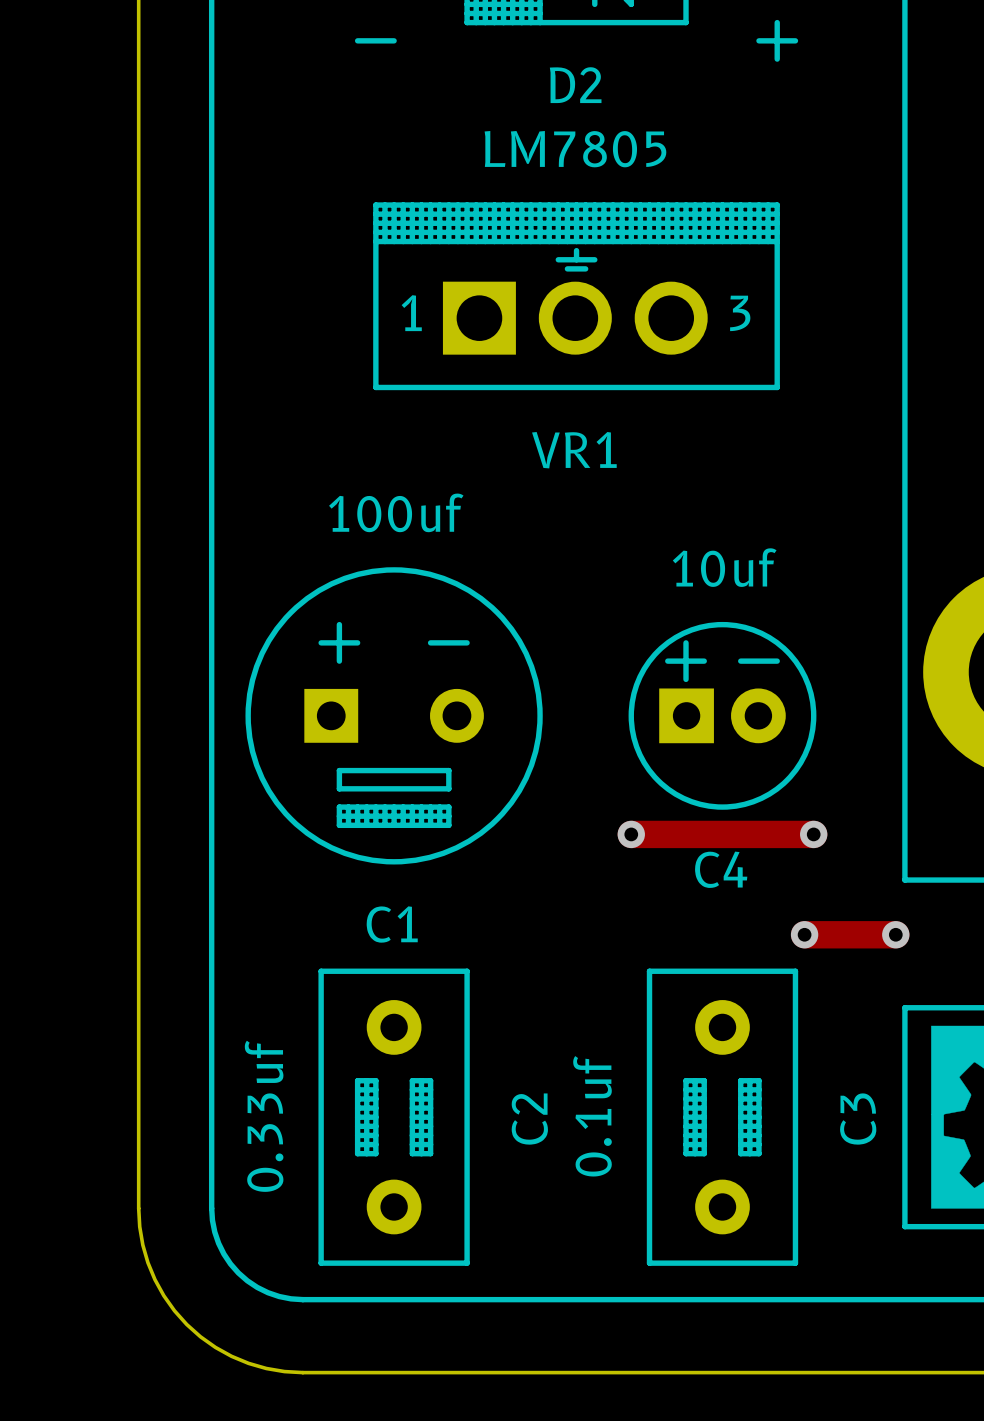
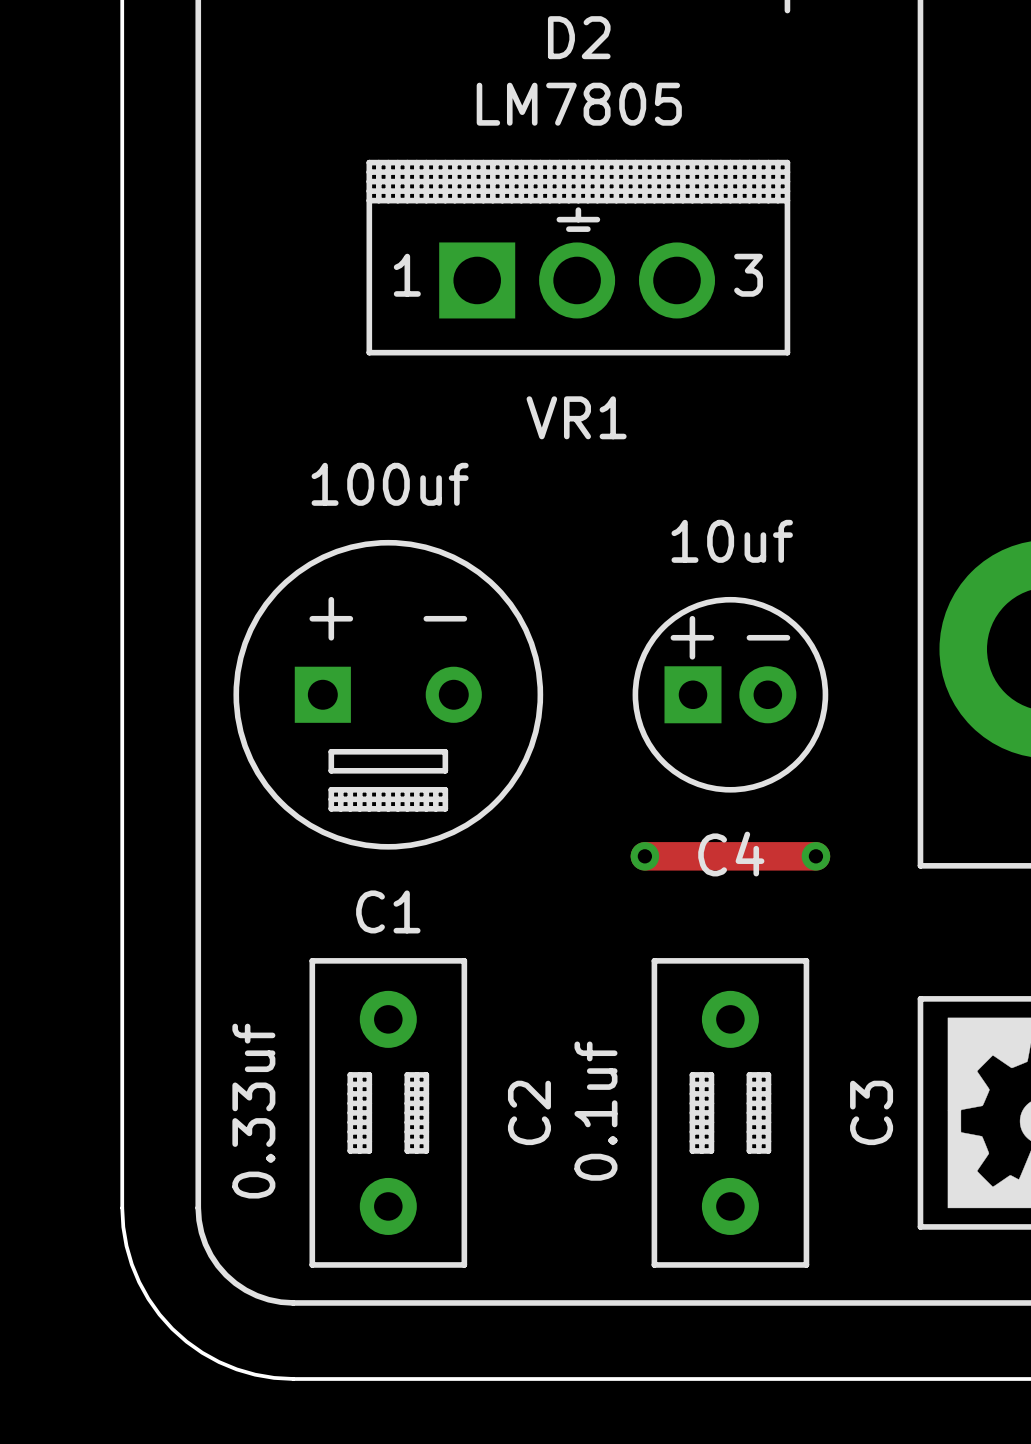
track: (631, 834) (813, 834) -> none
via position: (631, 834) -> (644, 856)
via: (813, 834) -> none
track: none -> (644, 856) (815, 856)
via: none -> (815, 856)
track: (804, 934) (895, 934) -> none
via: (804, 934) -> none
via: (895, 934) -> none

